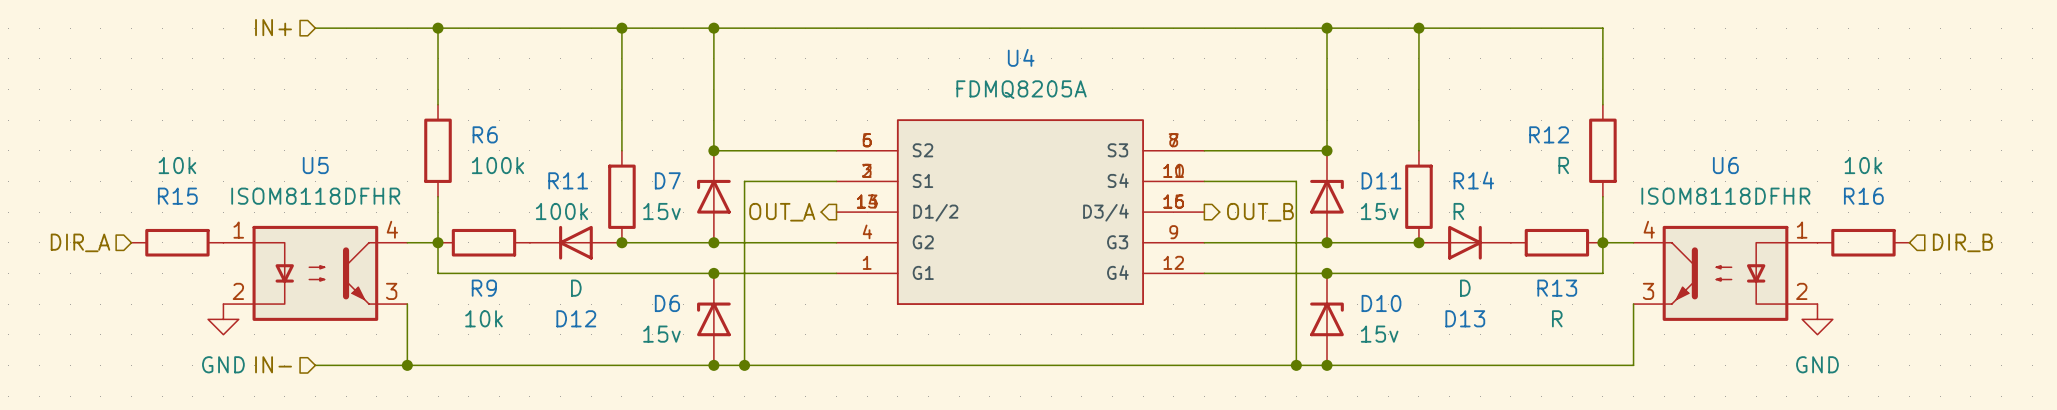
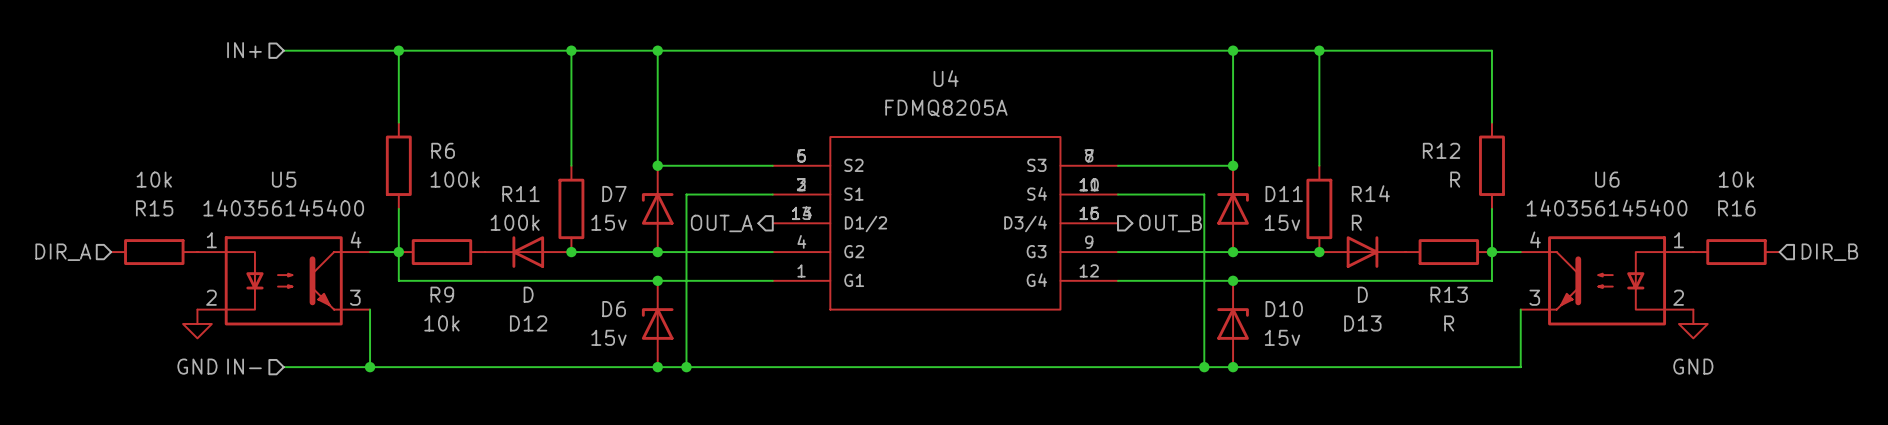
U5 value: ISOM8118DFHR (315, 196) -> 140356145400 (283, 208)
U6 value: ISOM8118DFHR (1725, 196) -> 140356145400 (1607, 208)

